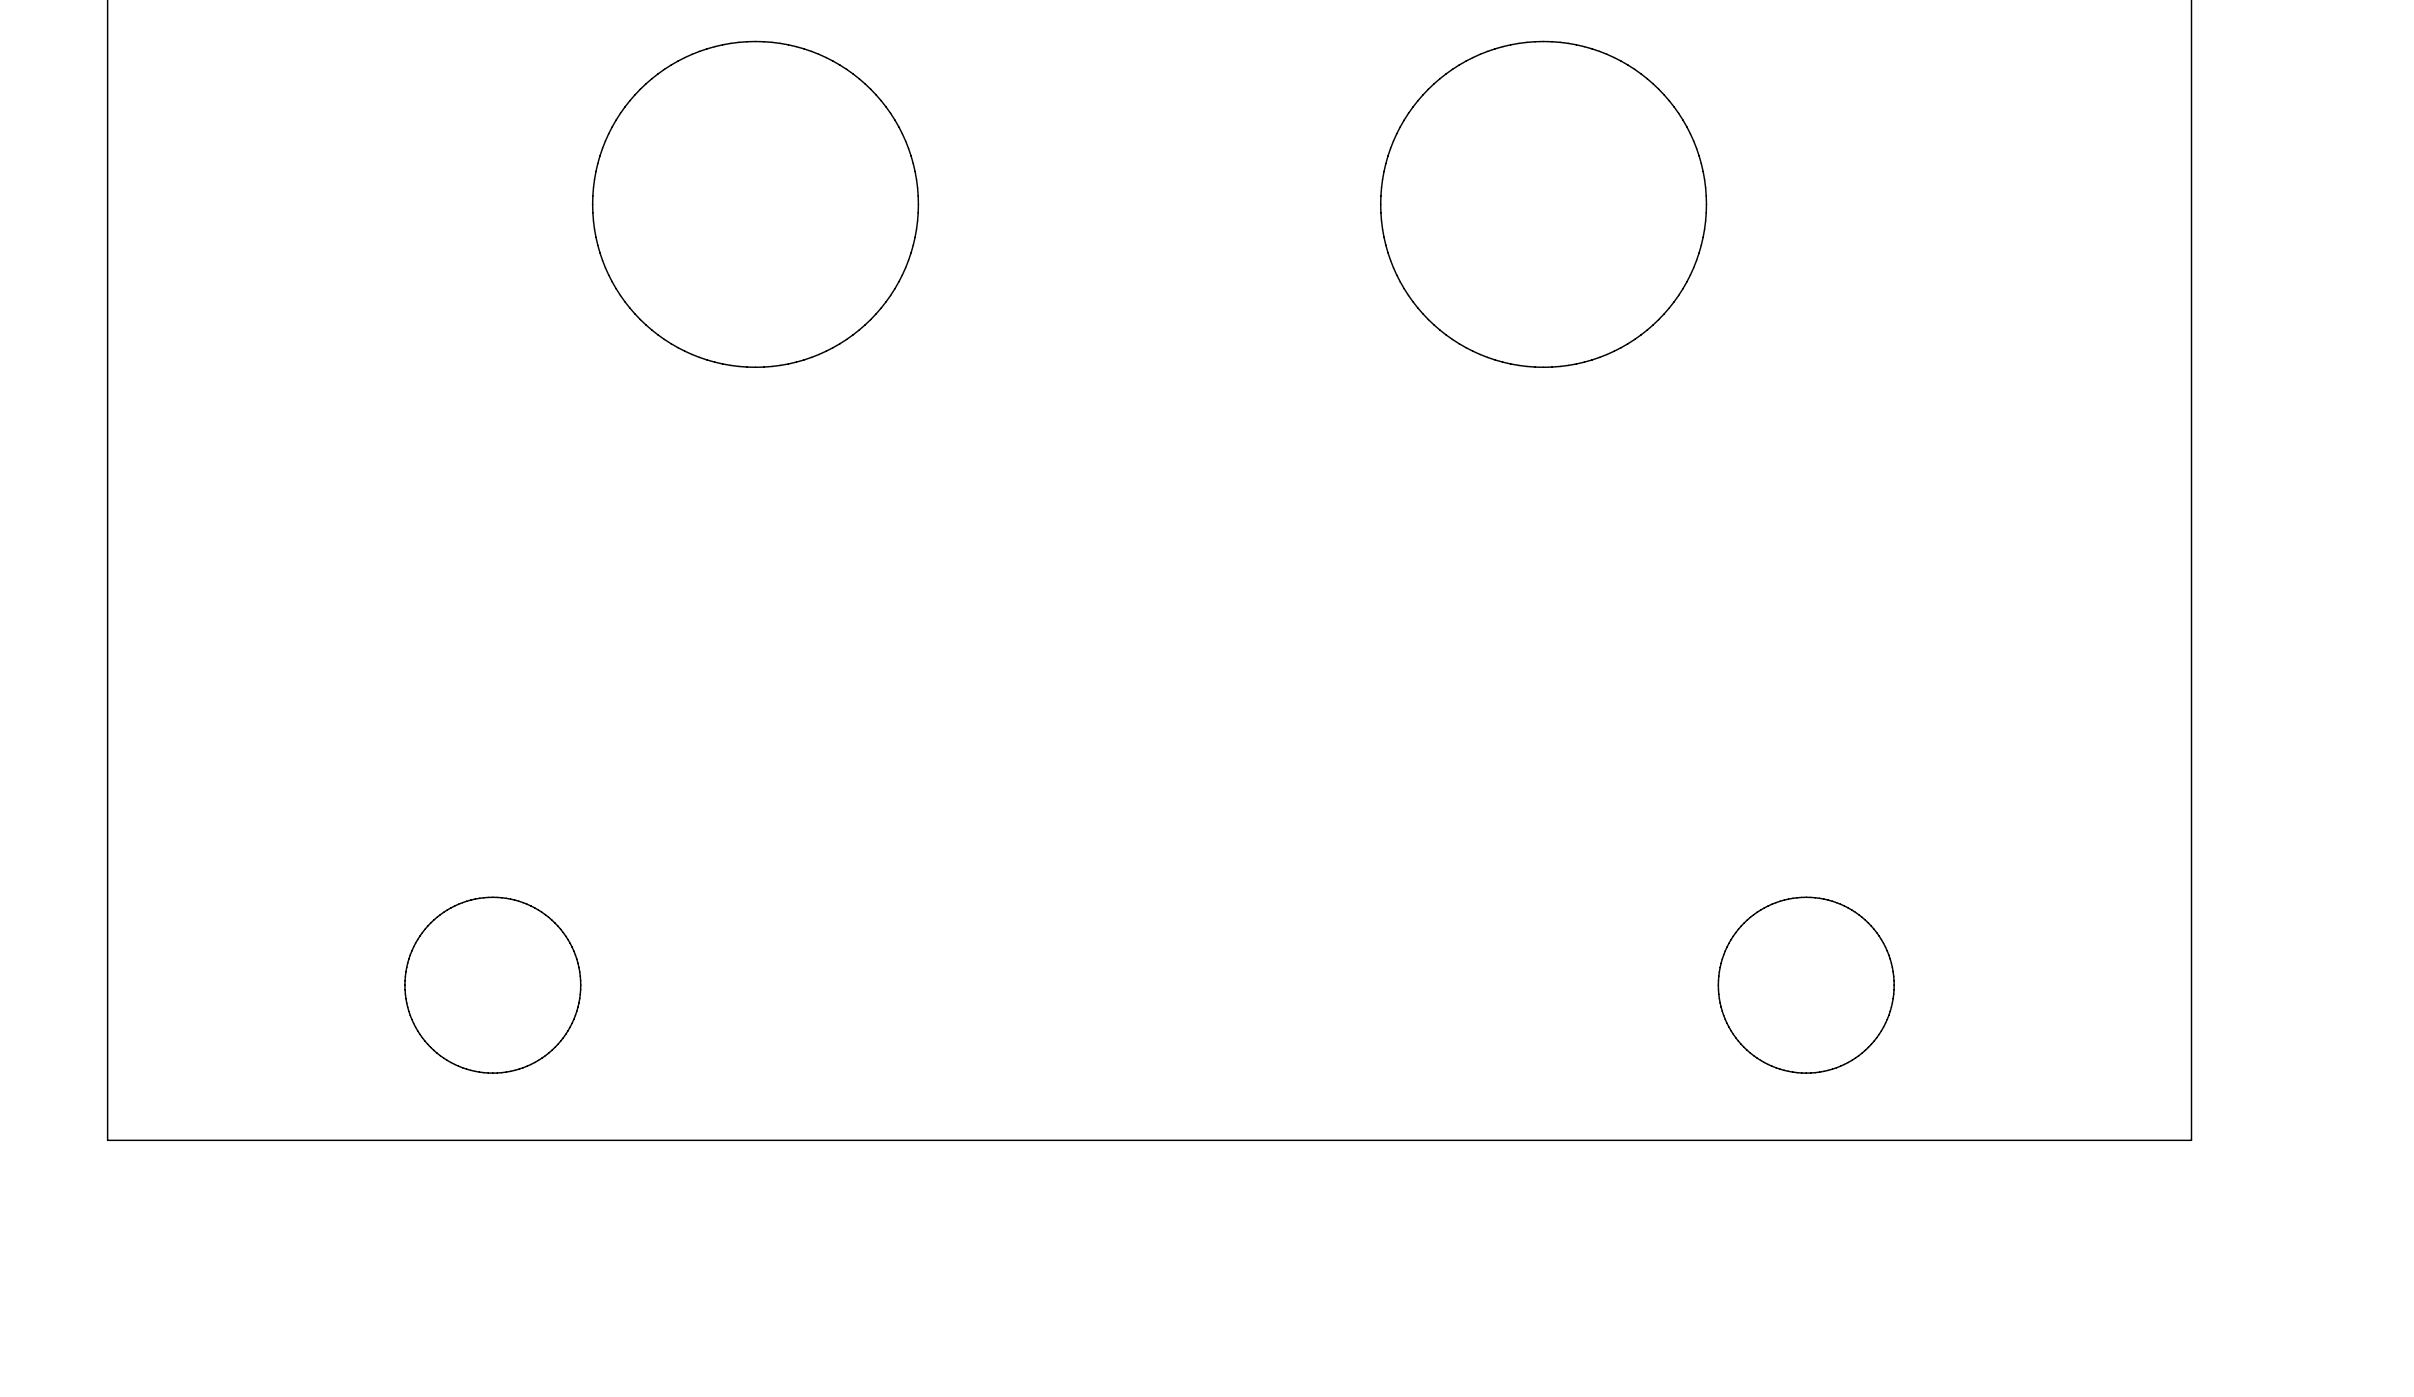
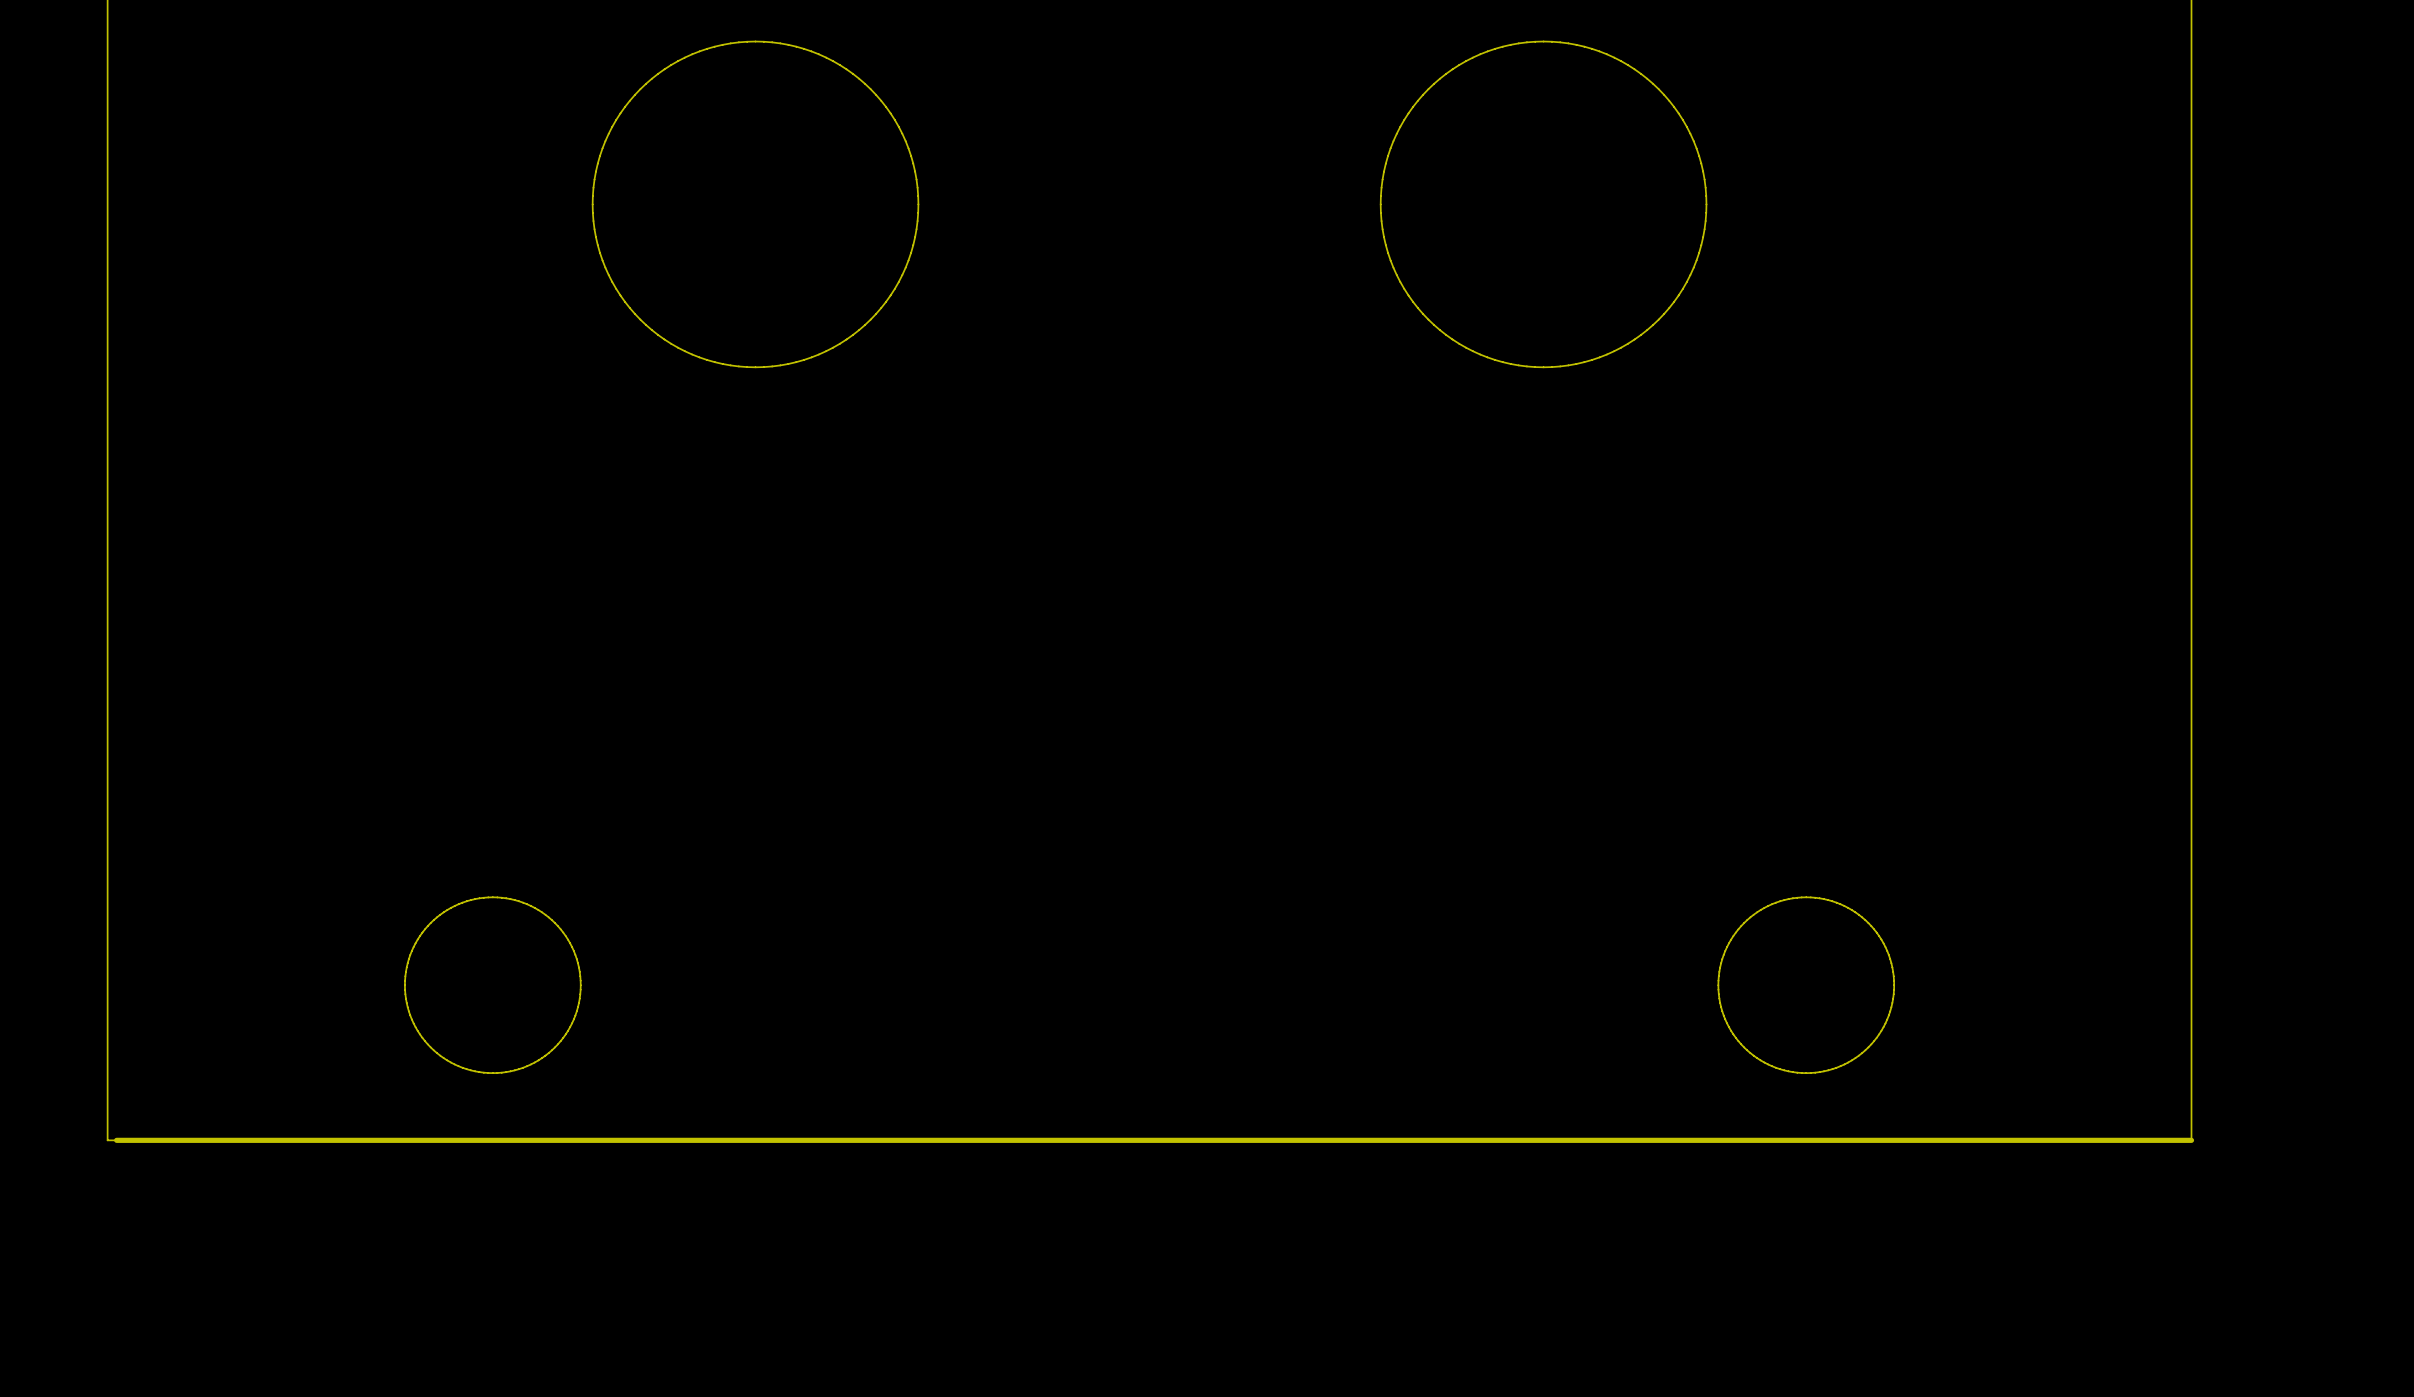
board edge width: thin (2191, 1140) (116, 1140) -> thick (2191, 1140) (116, 1140)

